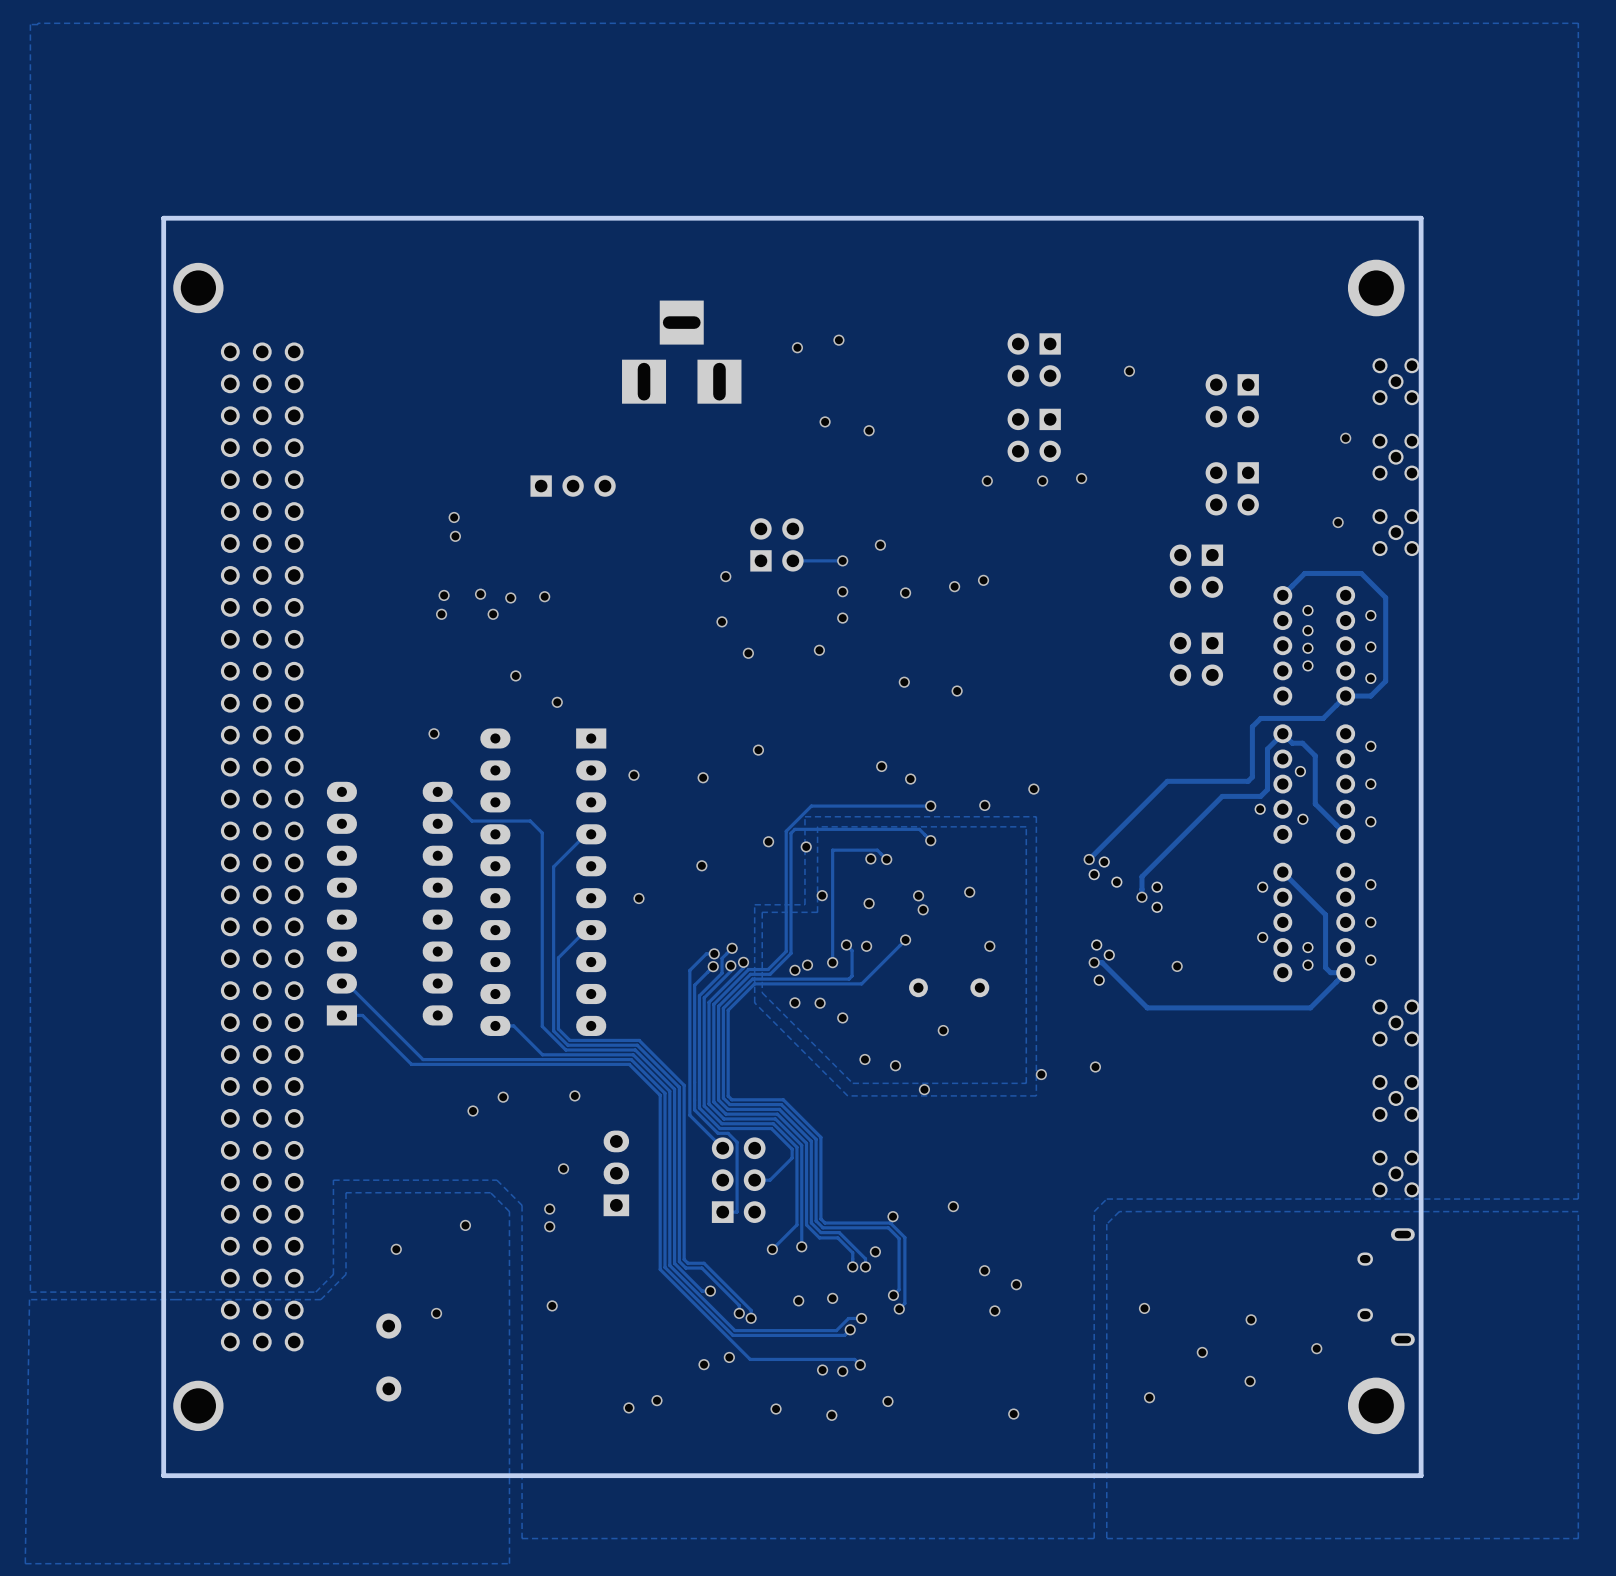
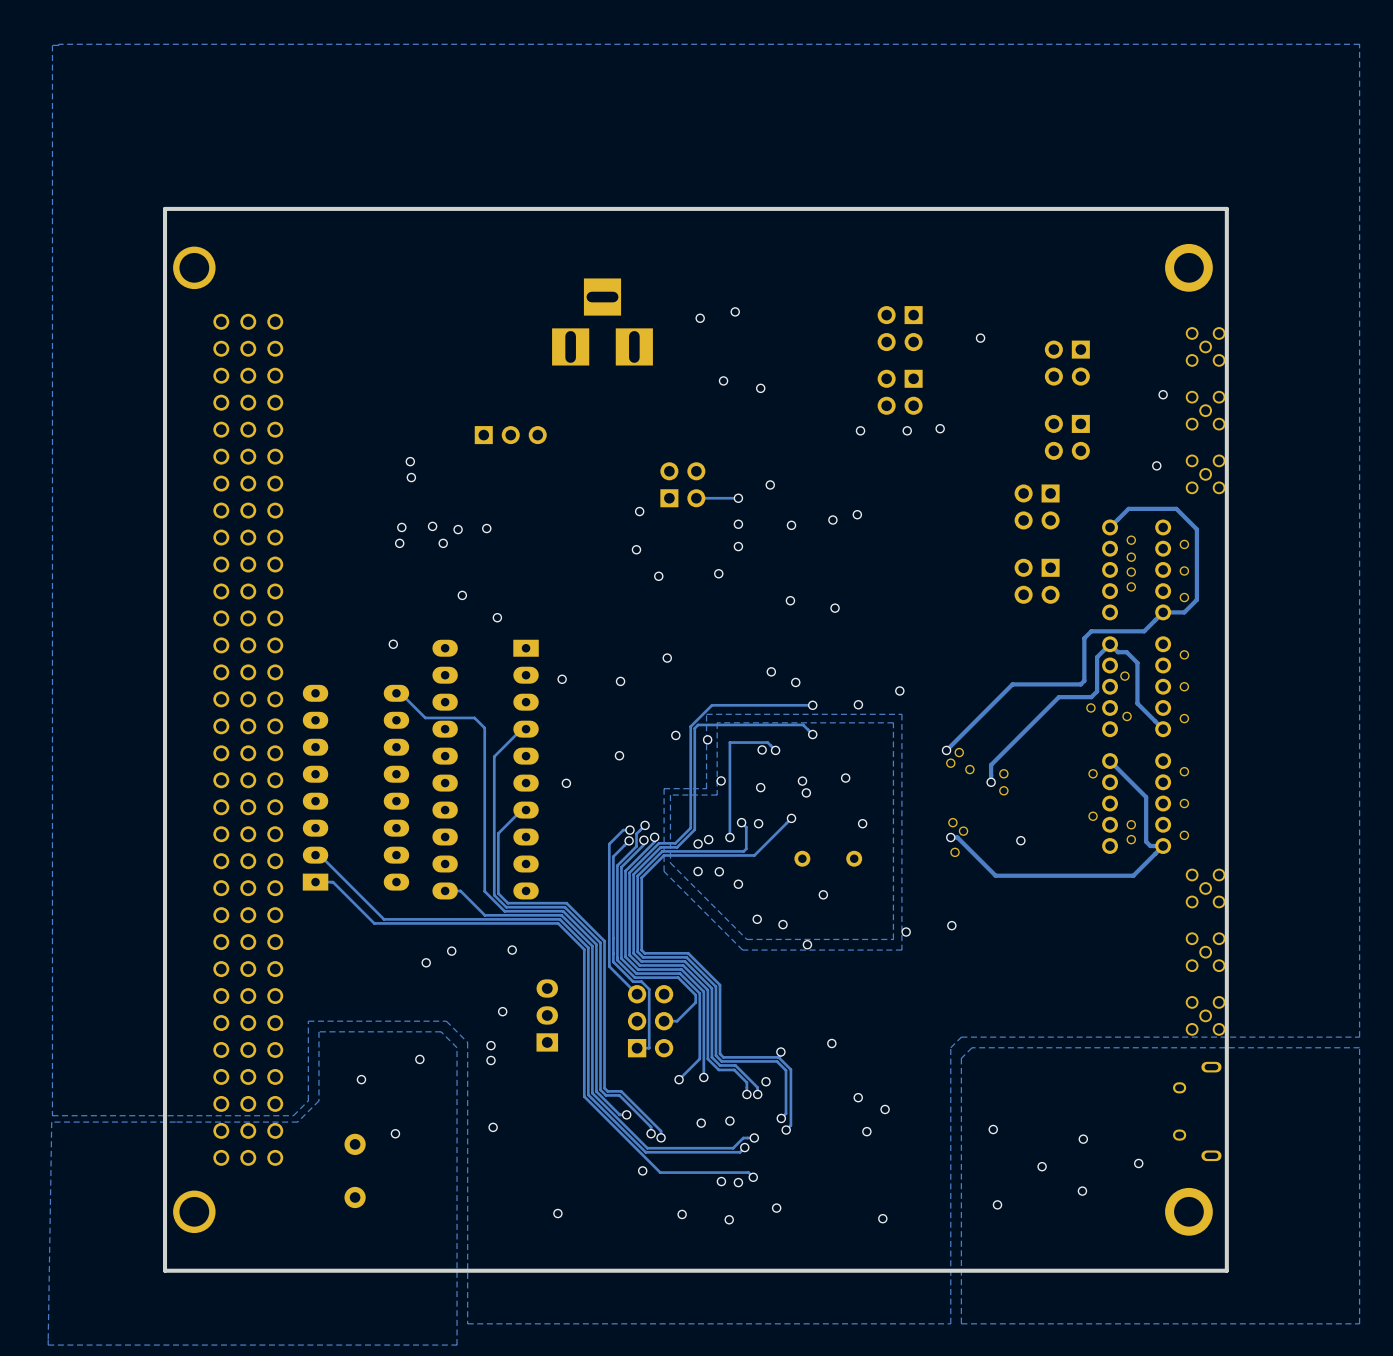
via: (704, 1364) -> none
via: (656, 1400) -> none

